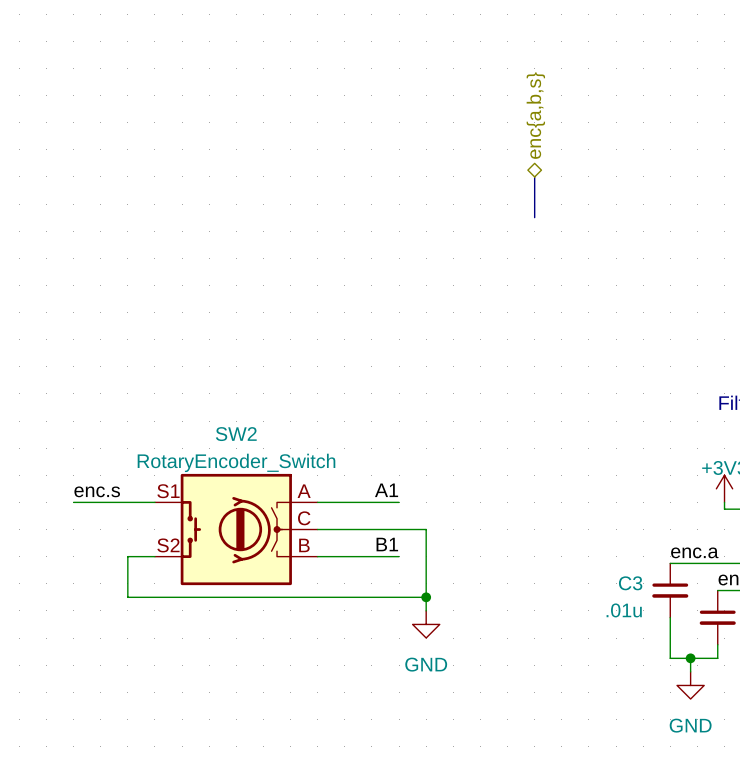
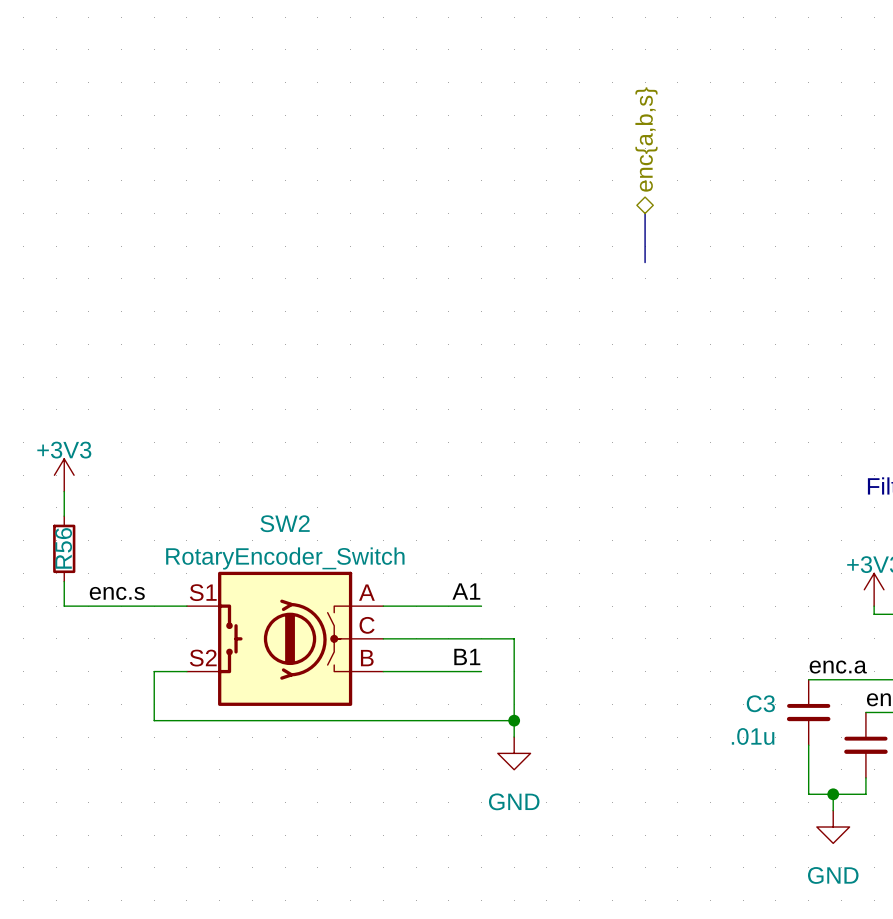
power symbol: none -> +3V3 (64, 475)
wire: none -> (64, 491) (64, 516)
R56: none -> (64, 548)
wire: none -> (64, 581) (64, 606) (88, 606)

